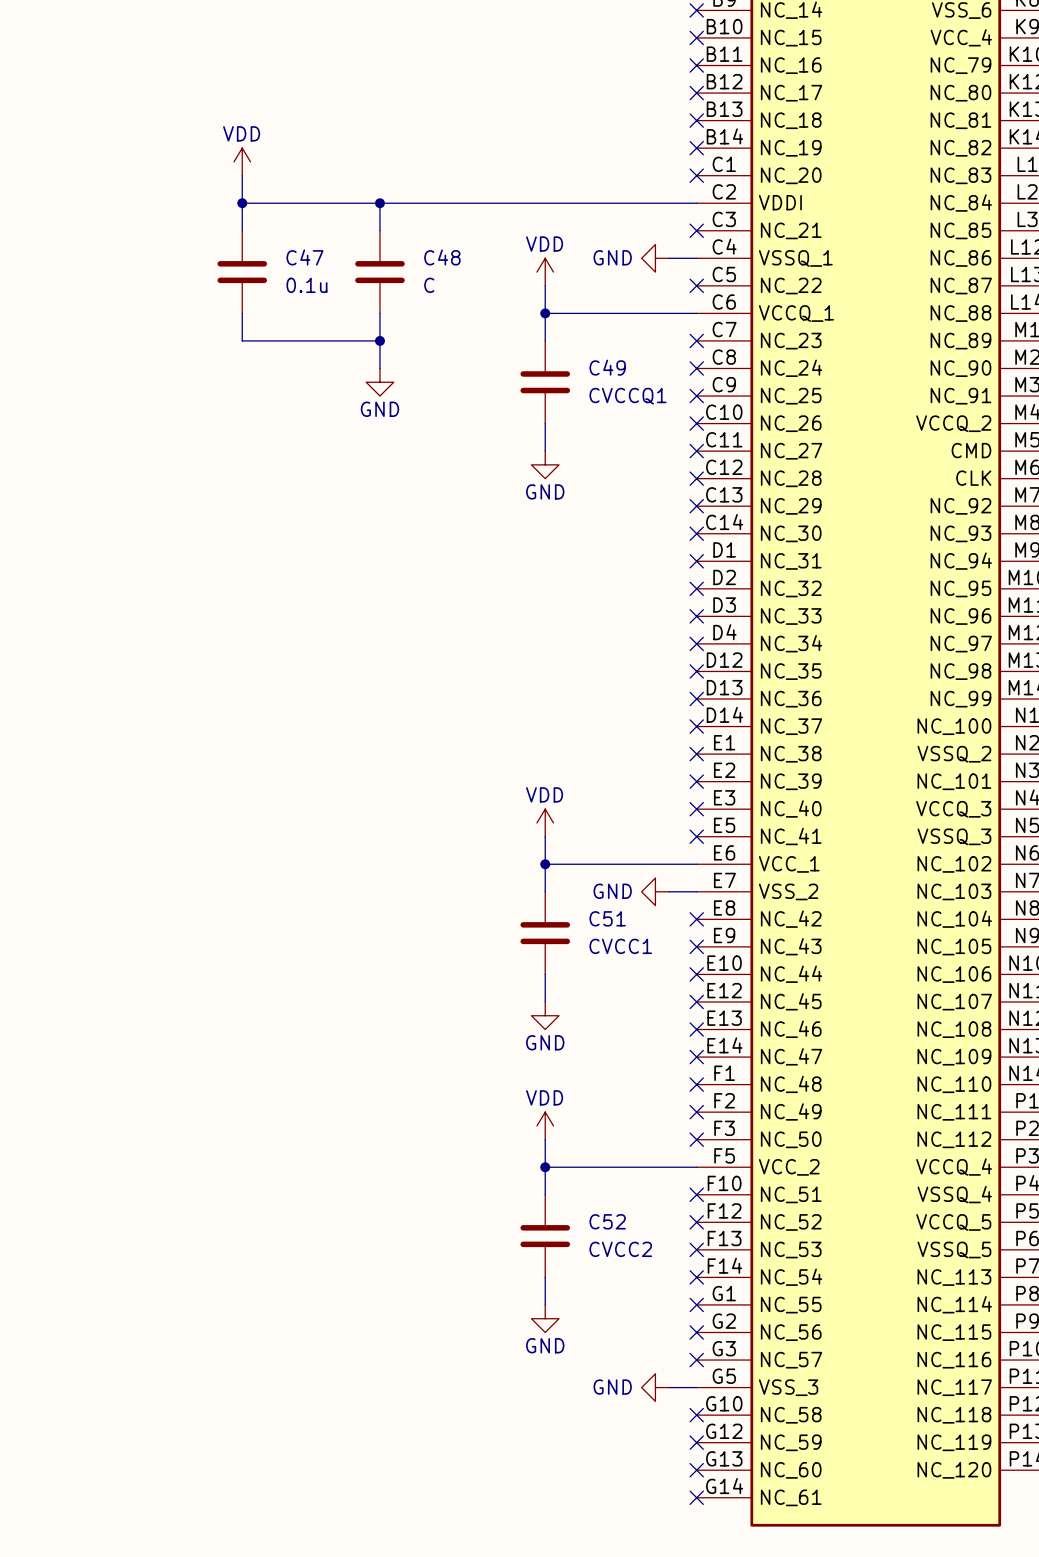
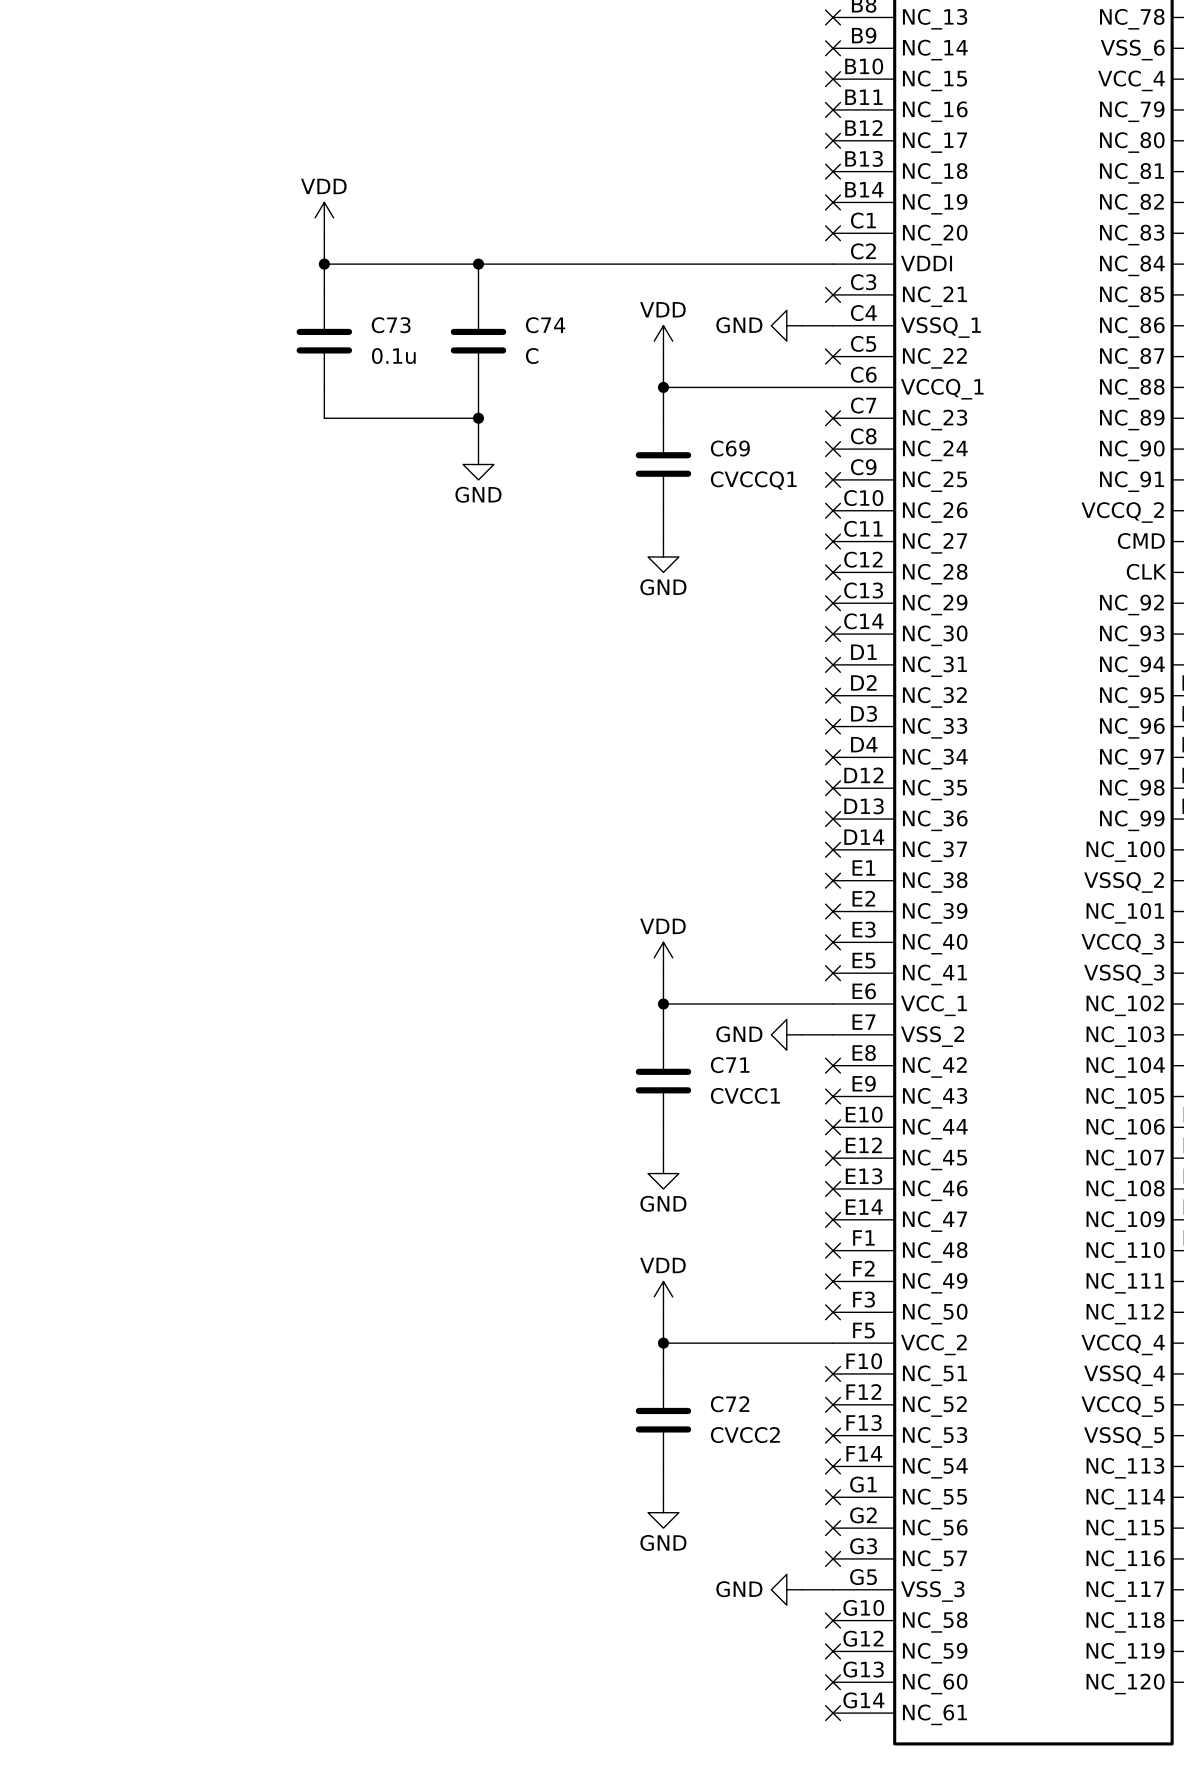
C47 name: C47 (304, 257) -> C73 (391, 325)
C48 name: C48 (442, 257) -> C74 (545, 325)
C49 name: C49 (607, 367) -> C69 (730, 448)
C51 name: C51 (607, 918) -> C71 (730, 1065)
C52 name: C52 (607, 1221) -> C72 (730, 1404)

